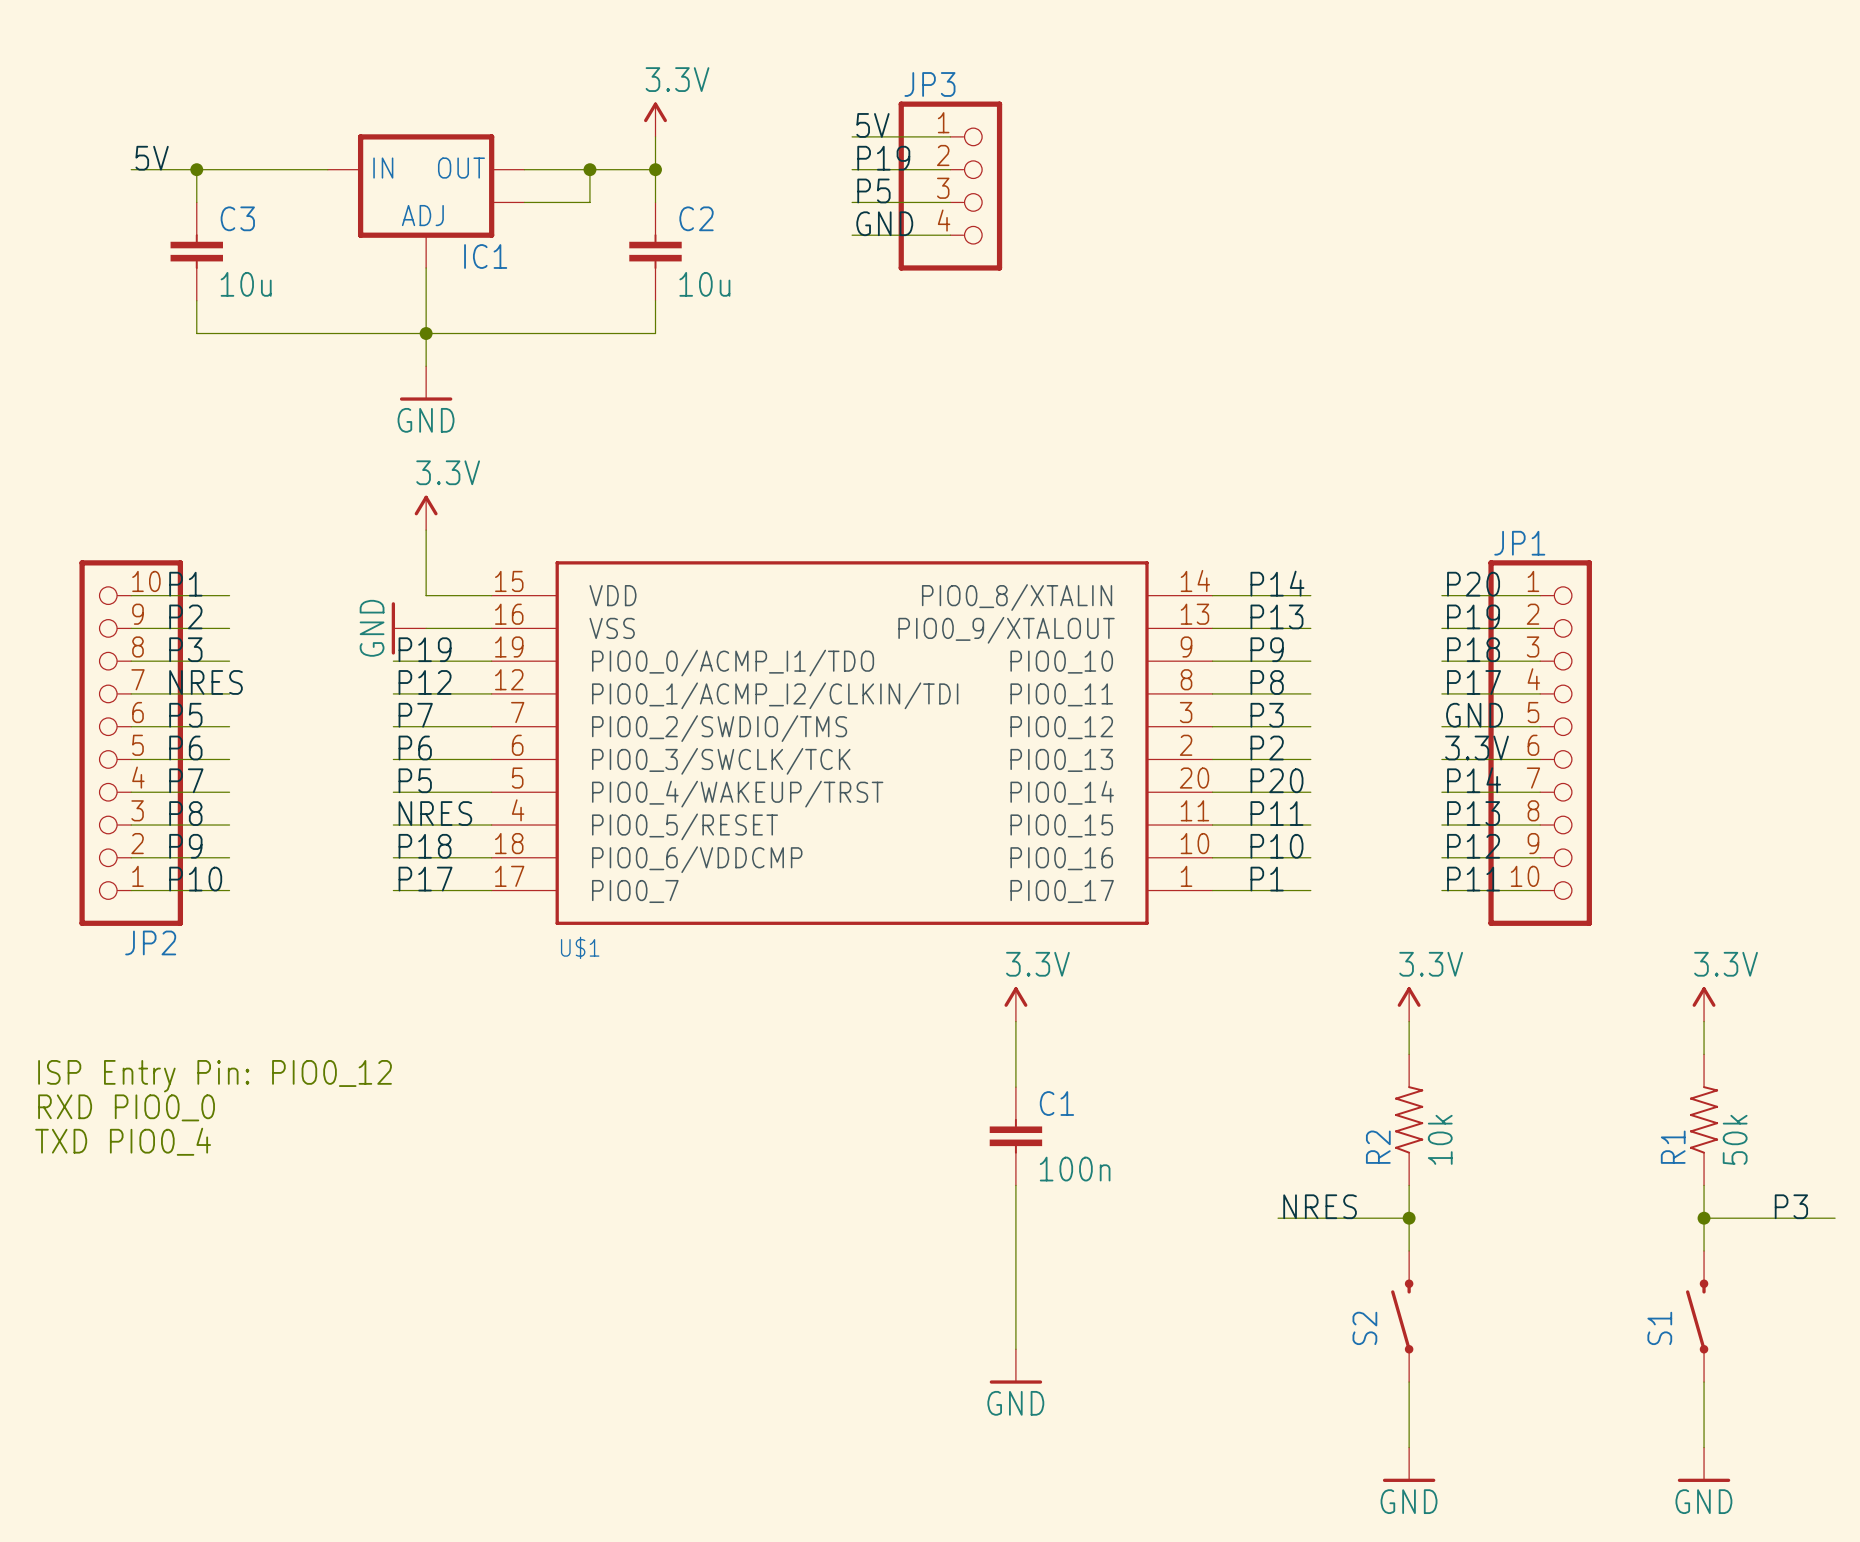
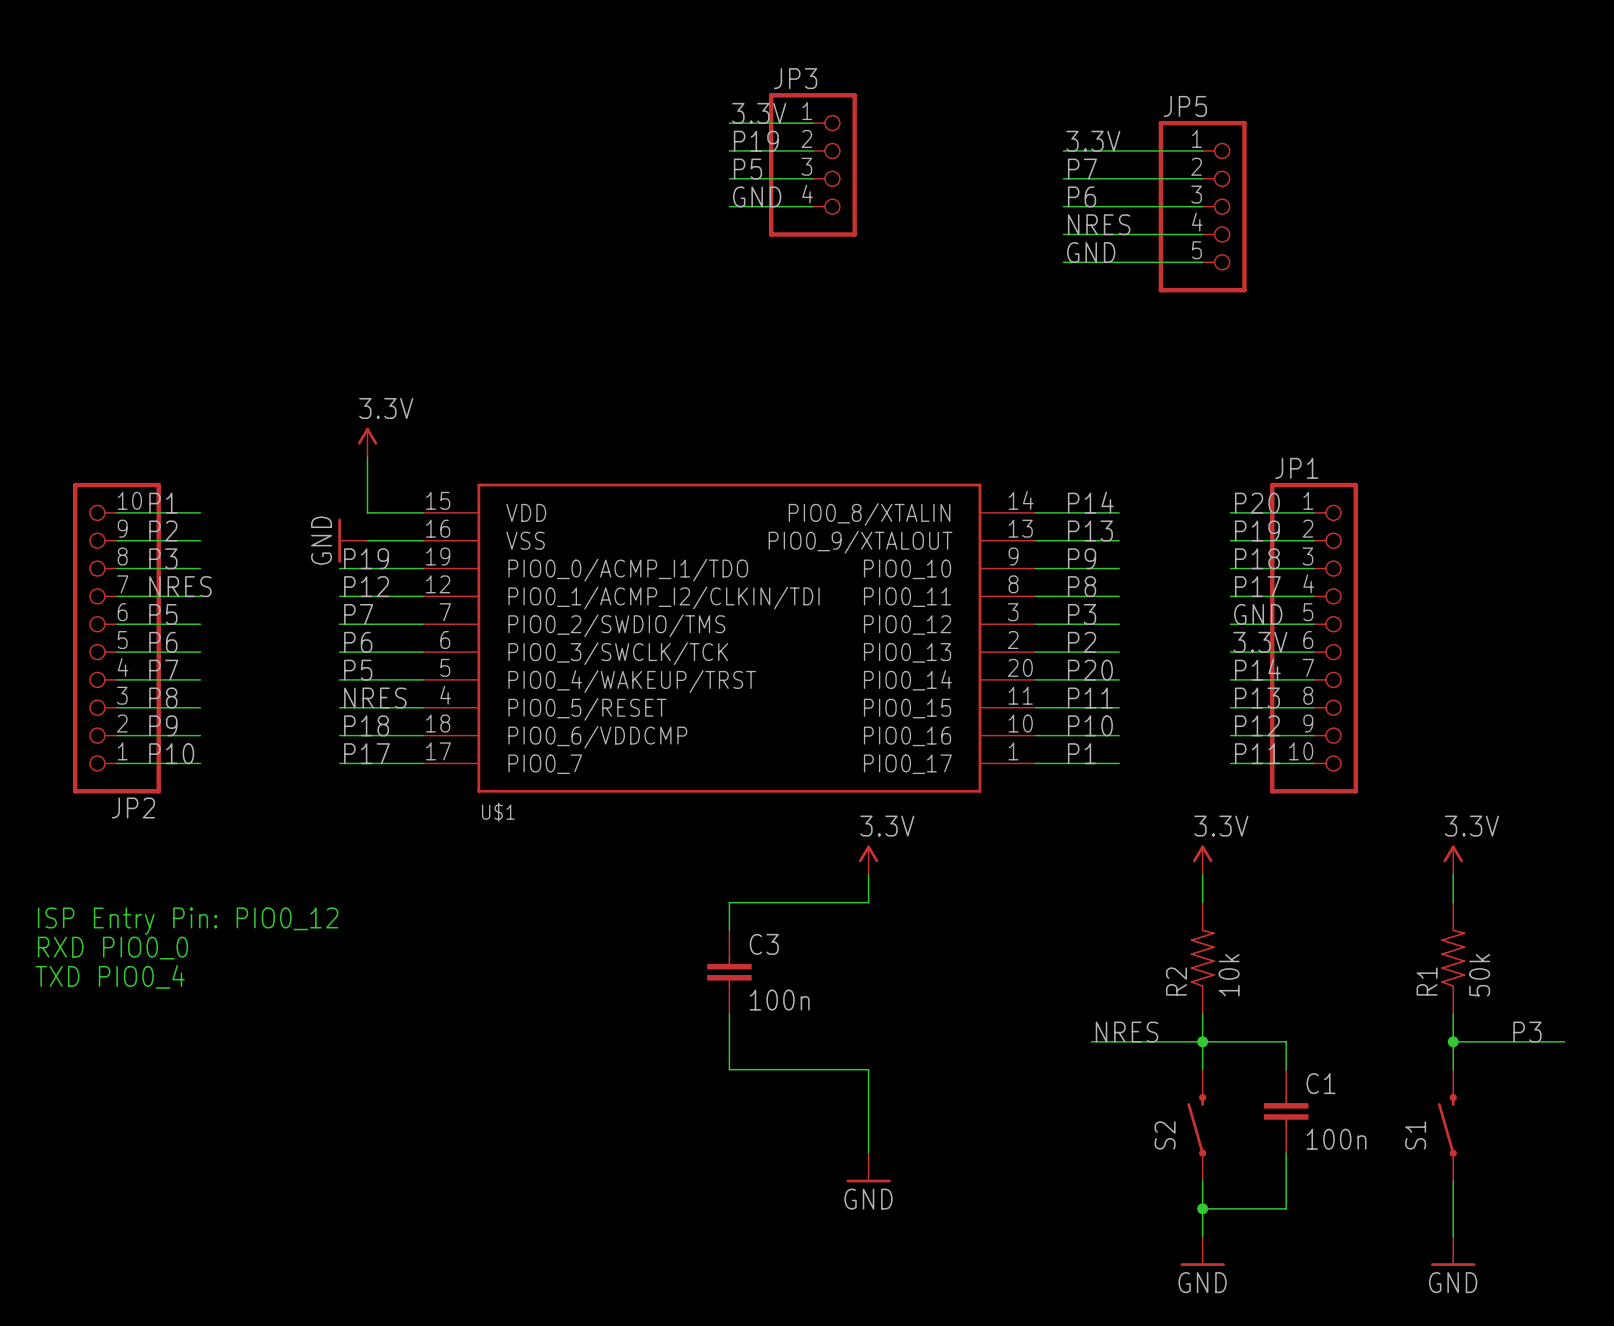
power symbol: 3.3V (655, 119) -> none
label: 5V (872, 125) -> 3.3V (759, 113)
wire: (655, 136) (655, 202) -> none
label: 5V (152, 158) -> none
label: none -> 3.3V (1093, 141)
wire: (131, 169) (327, 169) -> none
wire: (196, 169) (196, 202) -> none
junction: (196, 169) -> none
wire: (524, 169) (655, 169) -> none
wire: (589, 169) (589, 202) (524, 202) -> none
junction: (589, 169) -> none
junction: (655, 169) -> none
wire: none -> (1063, 150) (1202, 150)
label: none -> P7 (1082, 169)
IC1: (426, 201) -> none
wire: none -> (1063, 178) (1202, 178)
label: none -> P6 (1082, 196)
wire: none -> (1063, 206) (1202, 206)
JP5: none -> (1202, 206)
C3 position: (196, 251) -> (729, 972)
C2: 10u (655, 251) -> none
label: none -> NRES (1099, 224)
wire: (426, 267) (426, 366) -> none
wire: none -> (1063, 234) (1202, 234)
C3 value: 10u (246, 284) -> 100n (779, 1000)
label: none -> GND (1091, 252)
wire: (196, 300) (196, 333) (655, 333) (655, 300) -> none
wire: none -> (1063, 262) (1202, 262)
junction: (426, 333) -> none
power symbol: GND (426, 383) -> none
wire: (1015, 1054) (1015, 1087) -> (868, 902) (729, 902) (729, 930)
C1 position: (1015, 1136) -> (1286, 1111)
wire: (1015, 1185) (1015, 1250) -> (729, 1013) (729, 1069) (868, 1069)
wire: none -> (1202, 1041) (1286, 1041) (1286, 1069)
wire: none -> (1286, 1153) (1286, 1208) (1202, 1208)
junction: none -> (1202, 1208)

